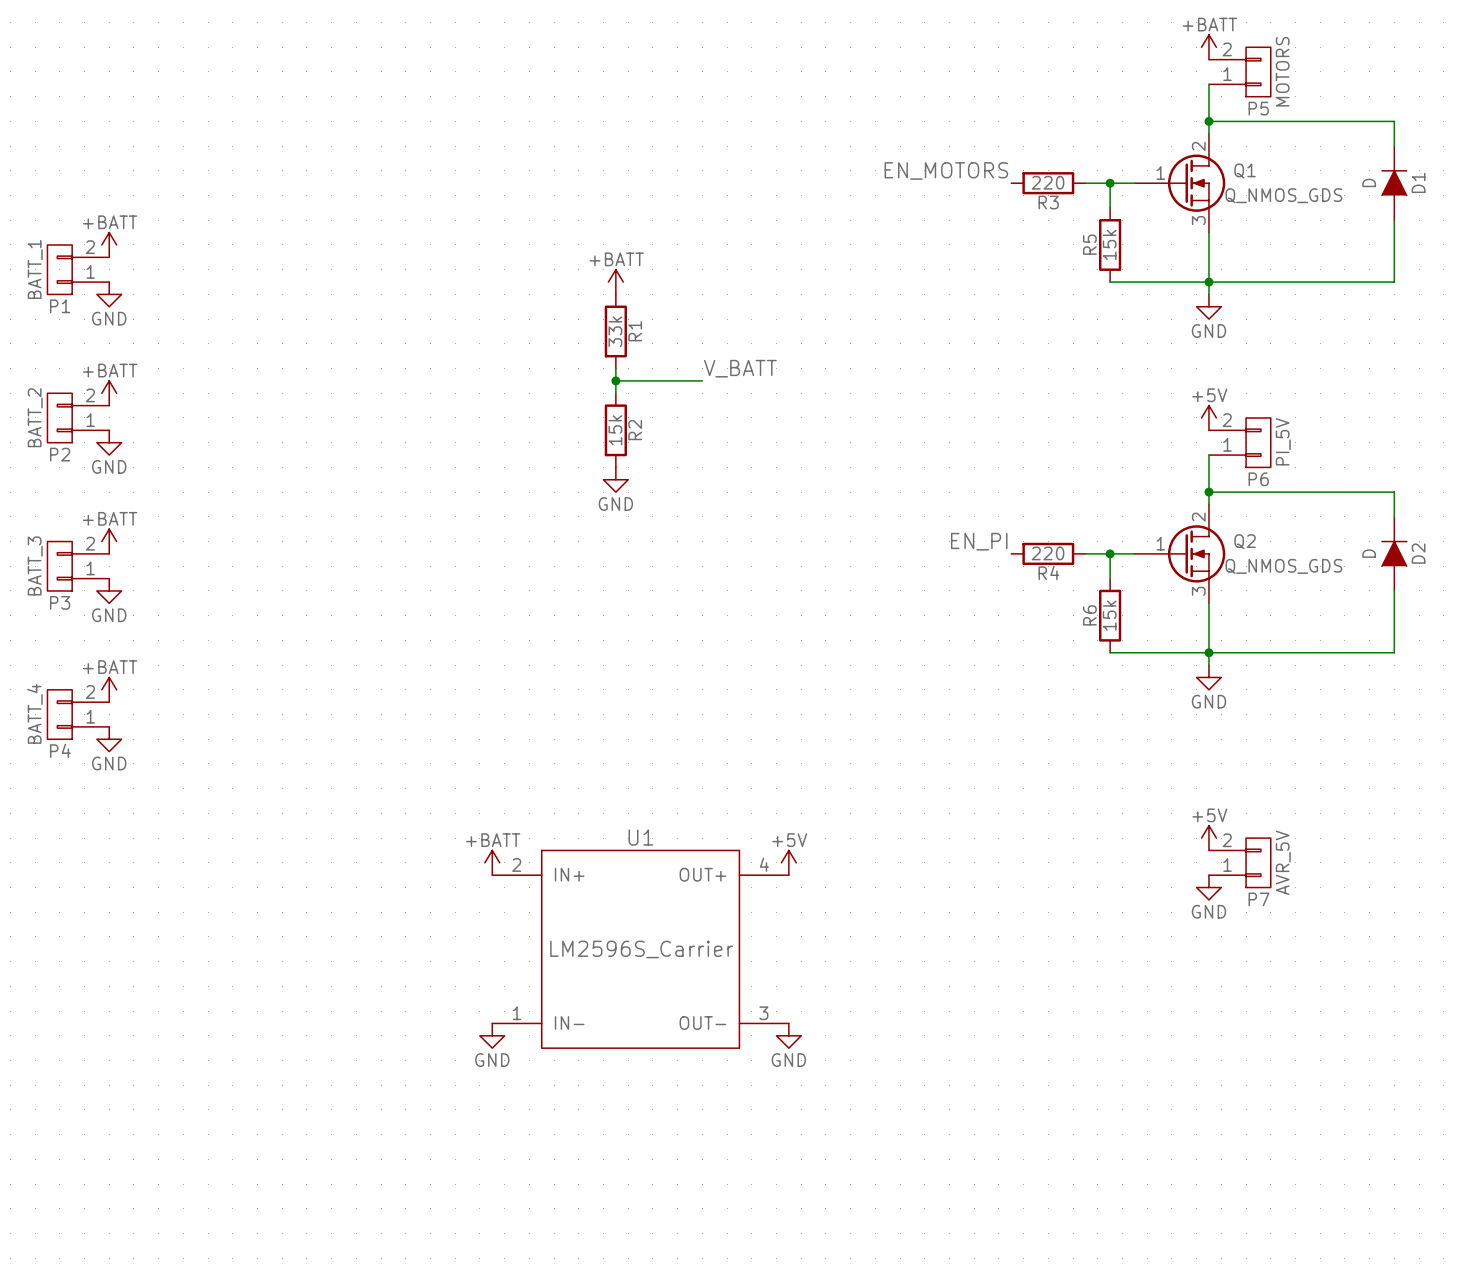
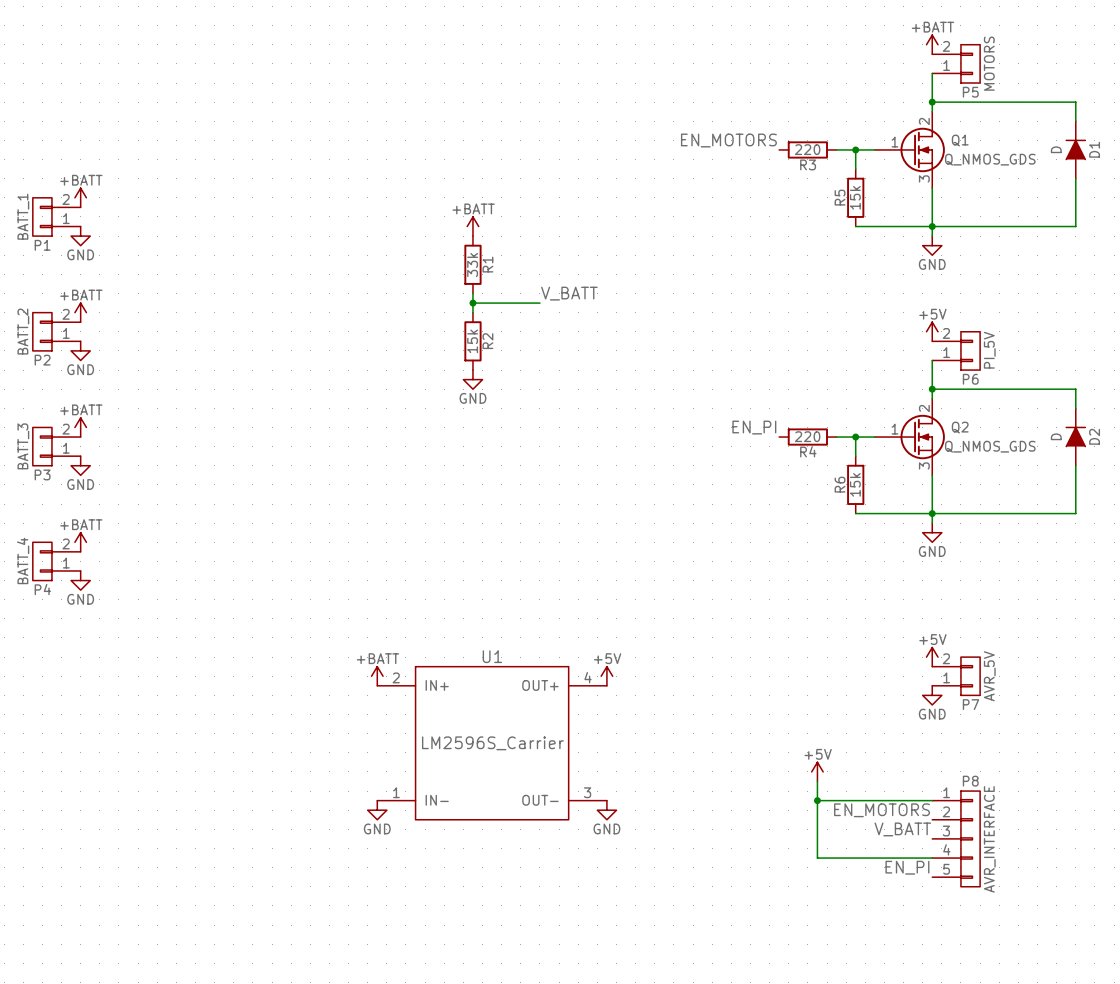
power symbol: none -> +5V (817, 771)
wire: none -> (817, 781) (817, 858) (932, 858)
wire: none -> (817, 800) (932, 800)
junction: none -> (817, 800)
label: none -> EN_MOTORS (882, 810)
label: none -> V_BATT (902, 829)
P8: none -> AVR_INTERFACE (956, 838)
label: none -> EN_PI (907, 867)

